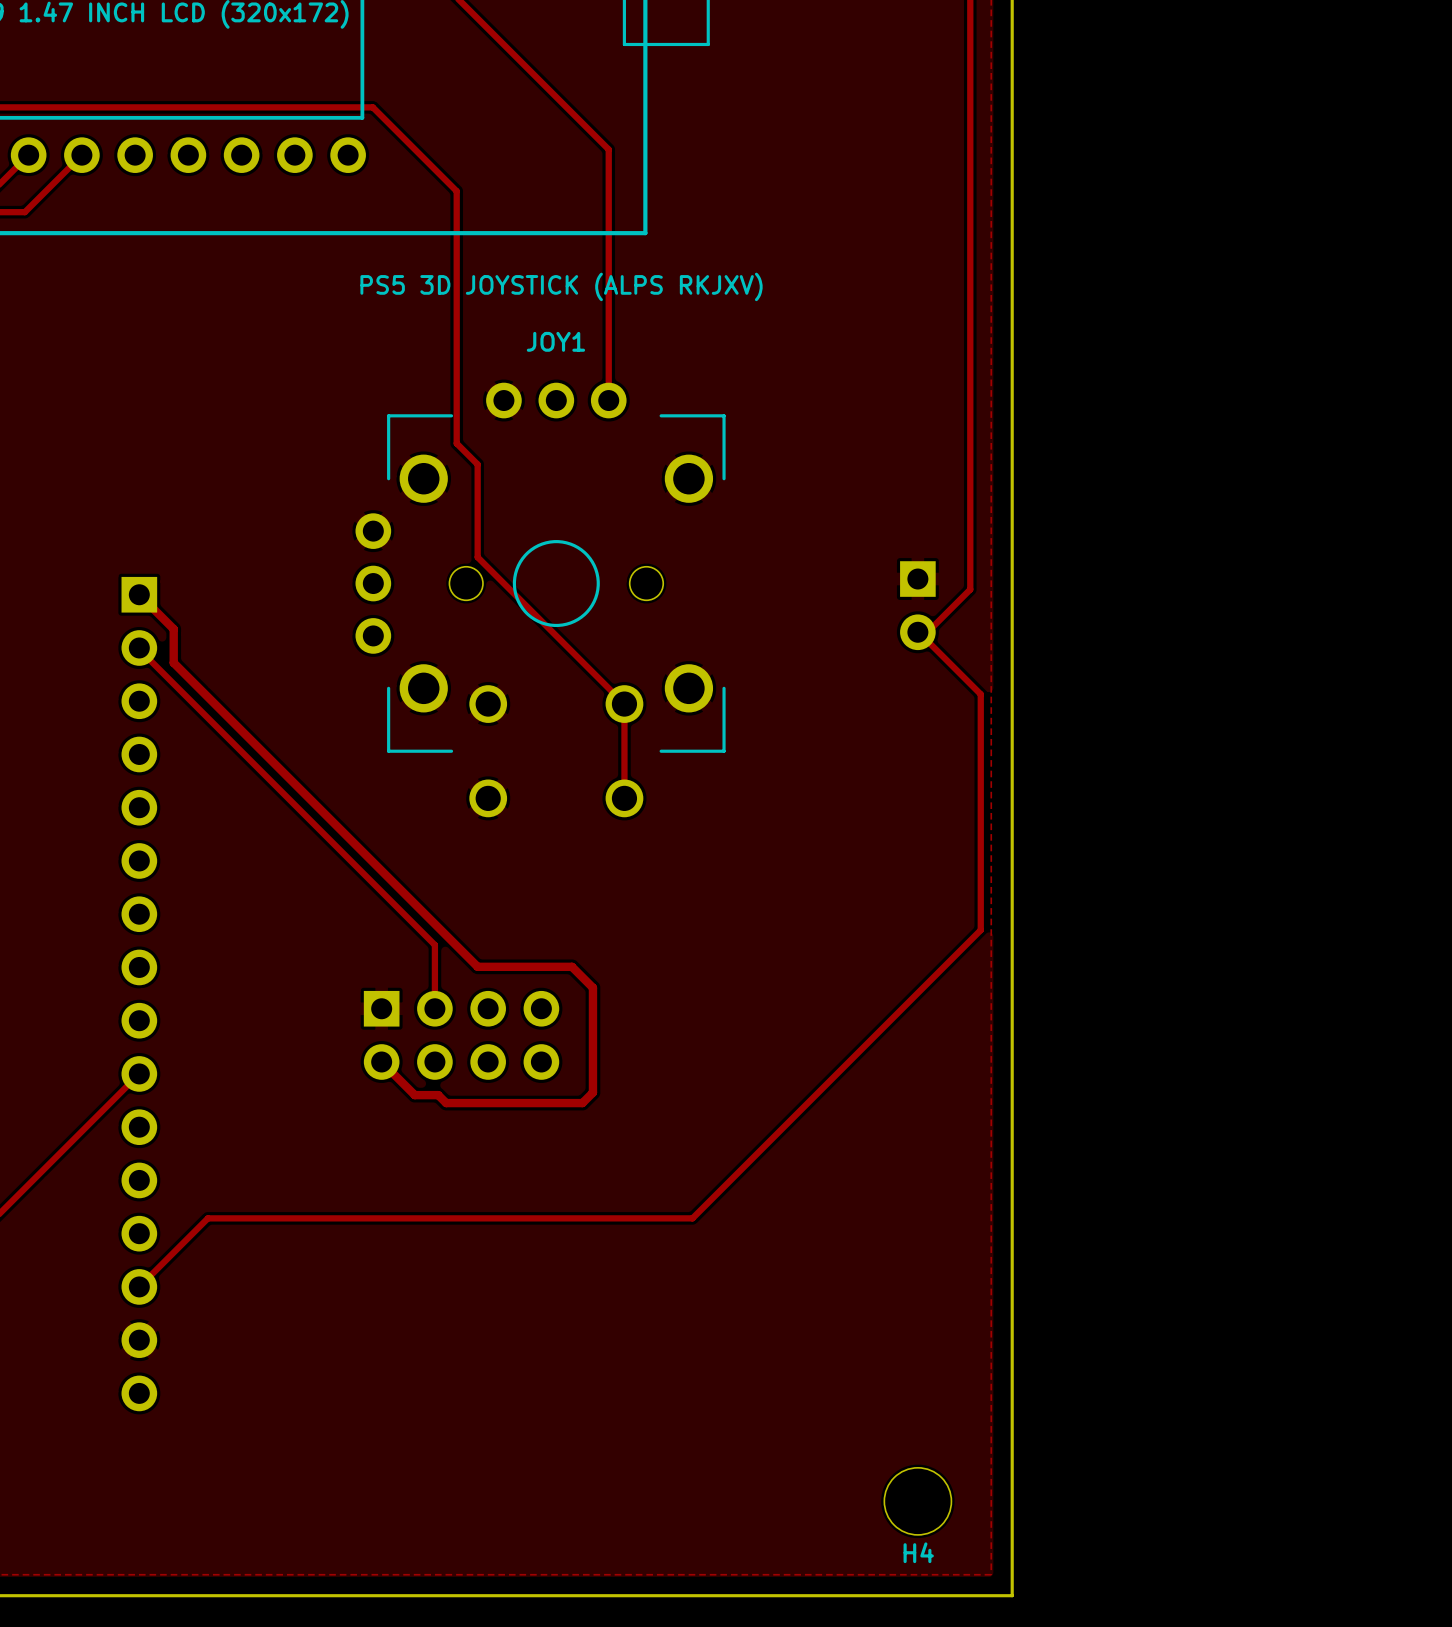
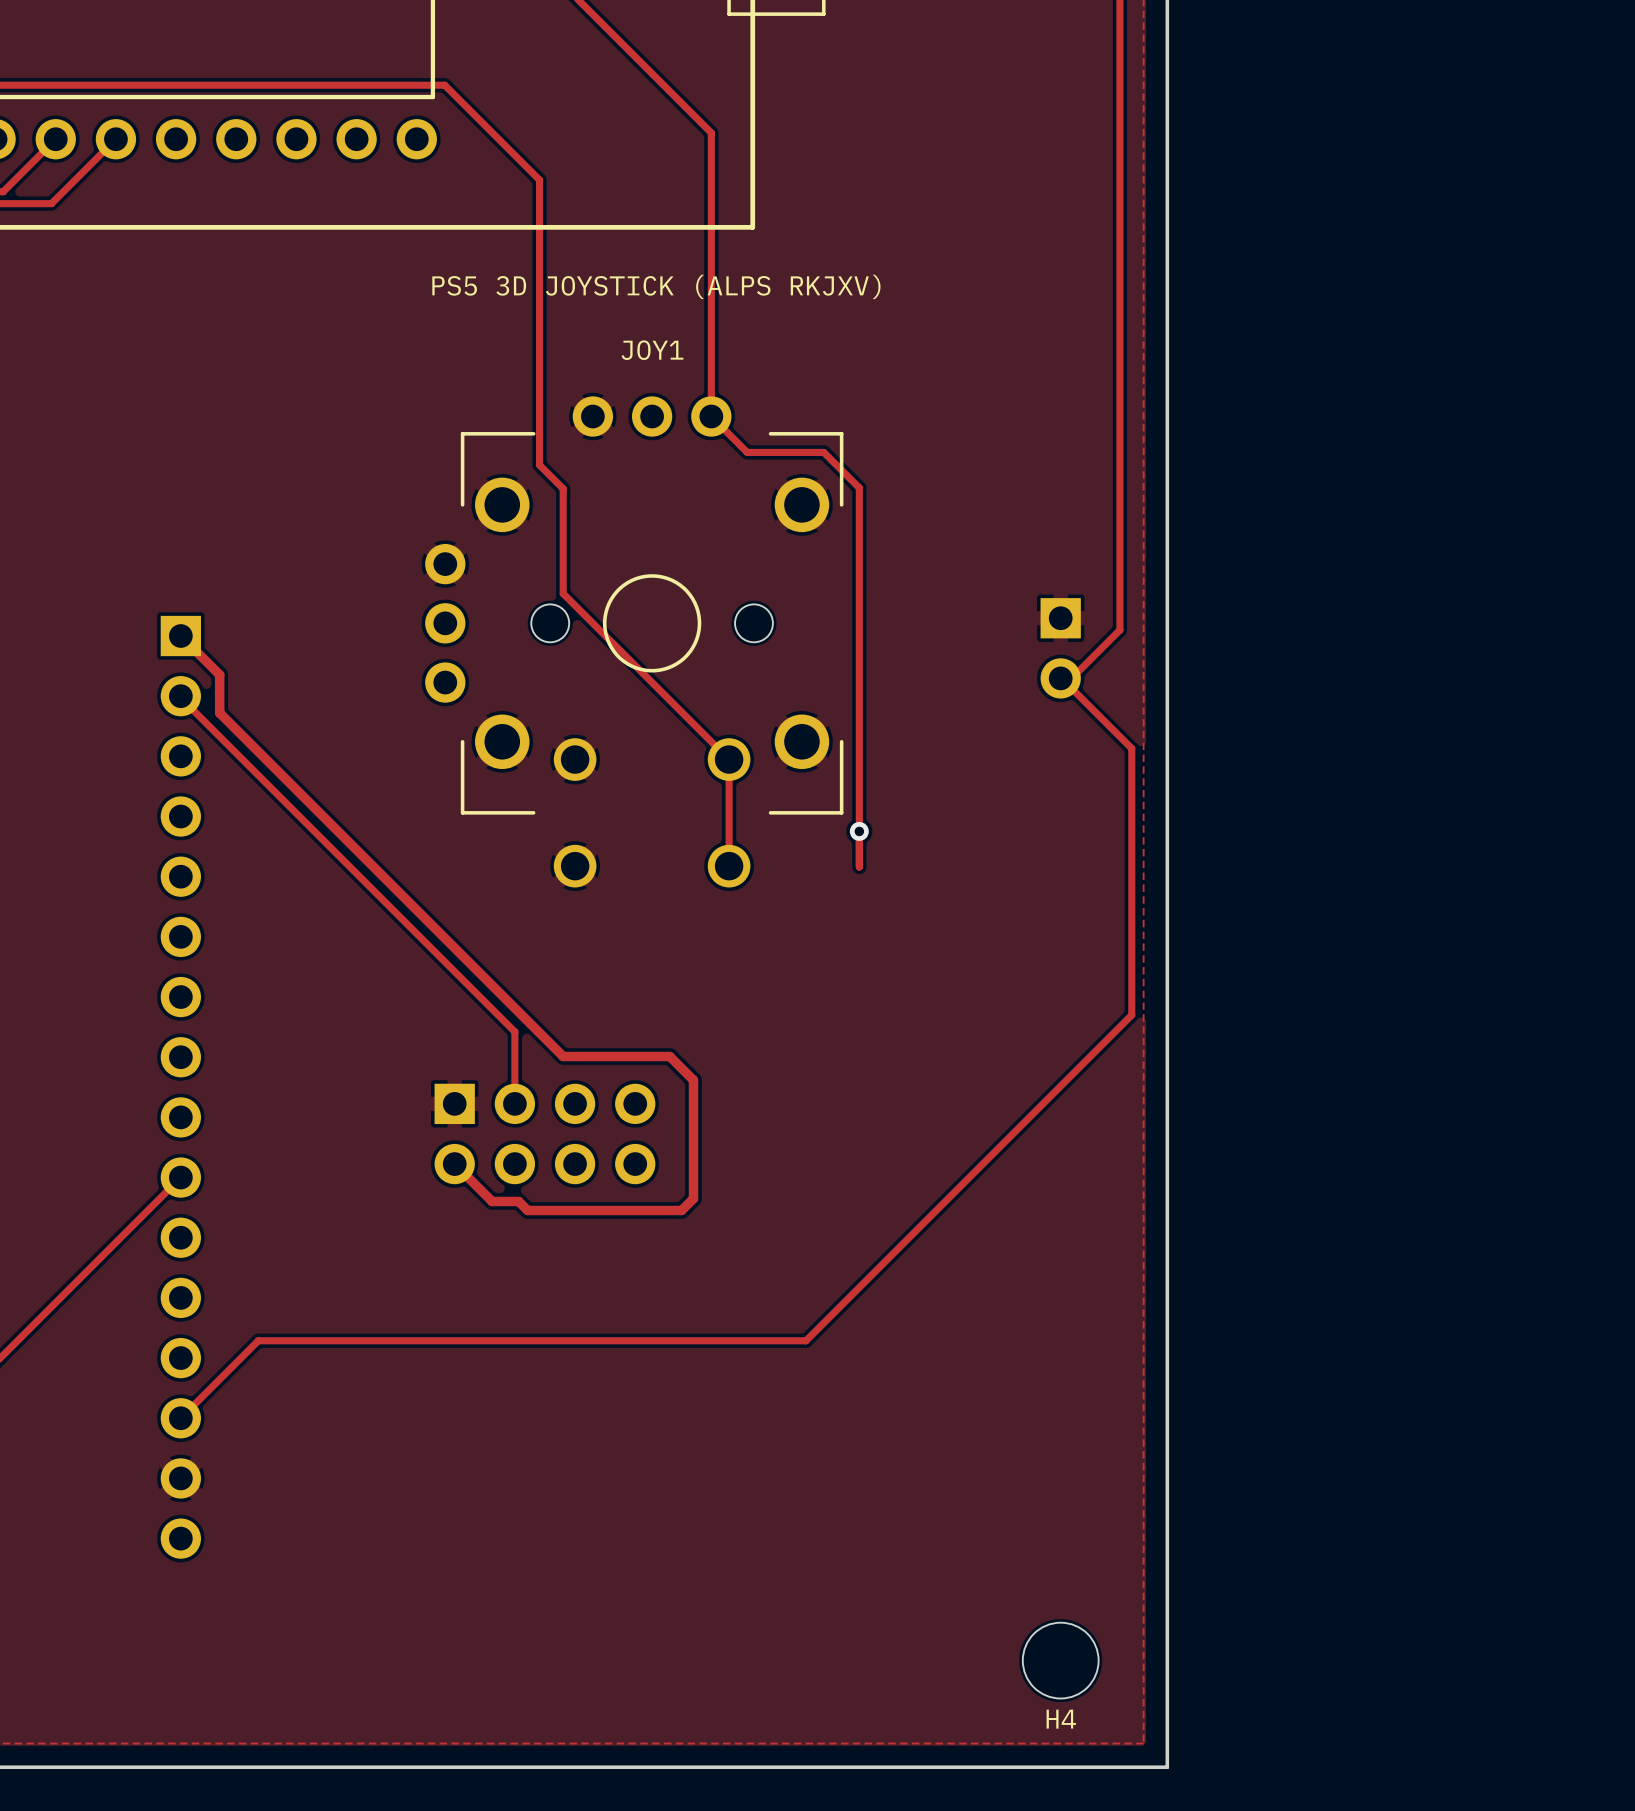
track: none -> (711, 416) (747, 452) (823, 452) (859, 487) (859, 866)
via: none -> (859, 831)

